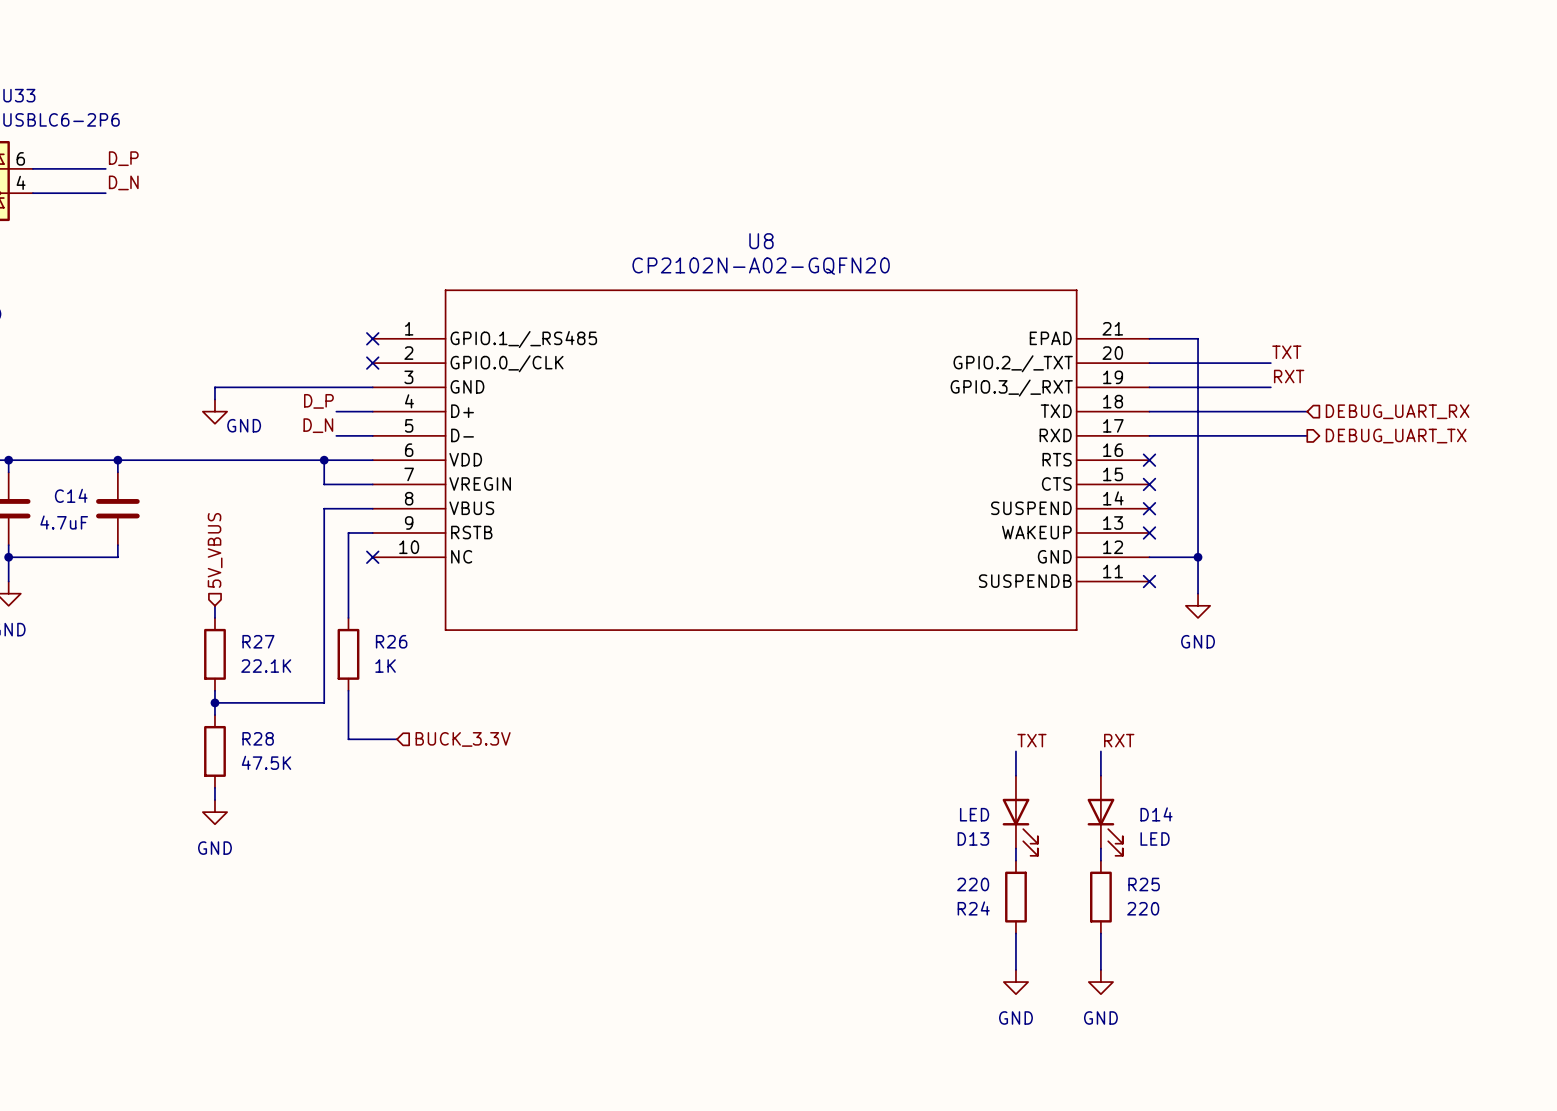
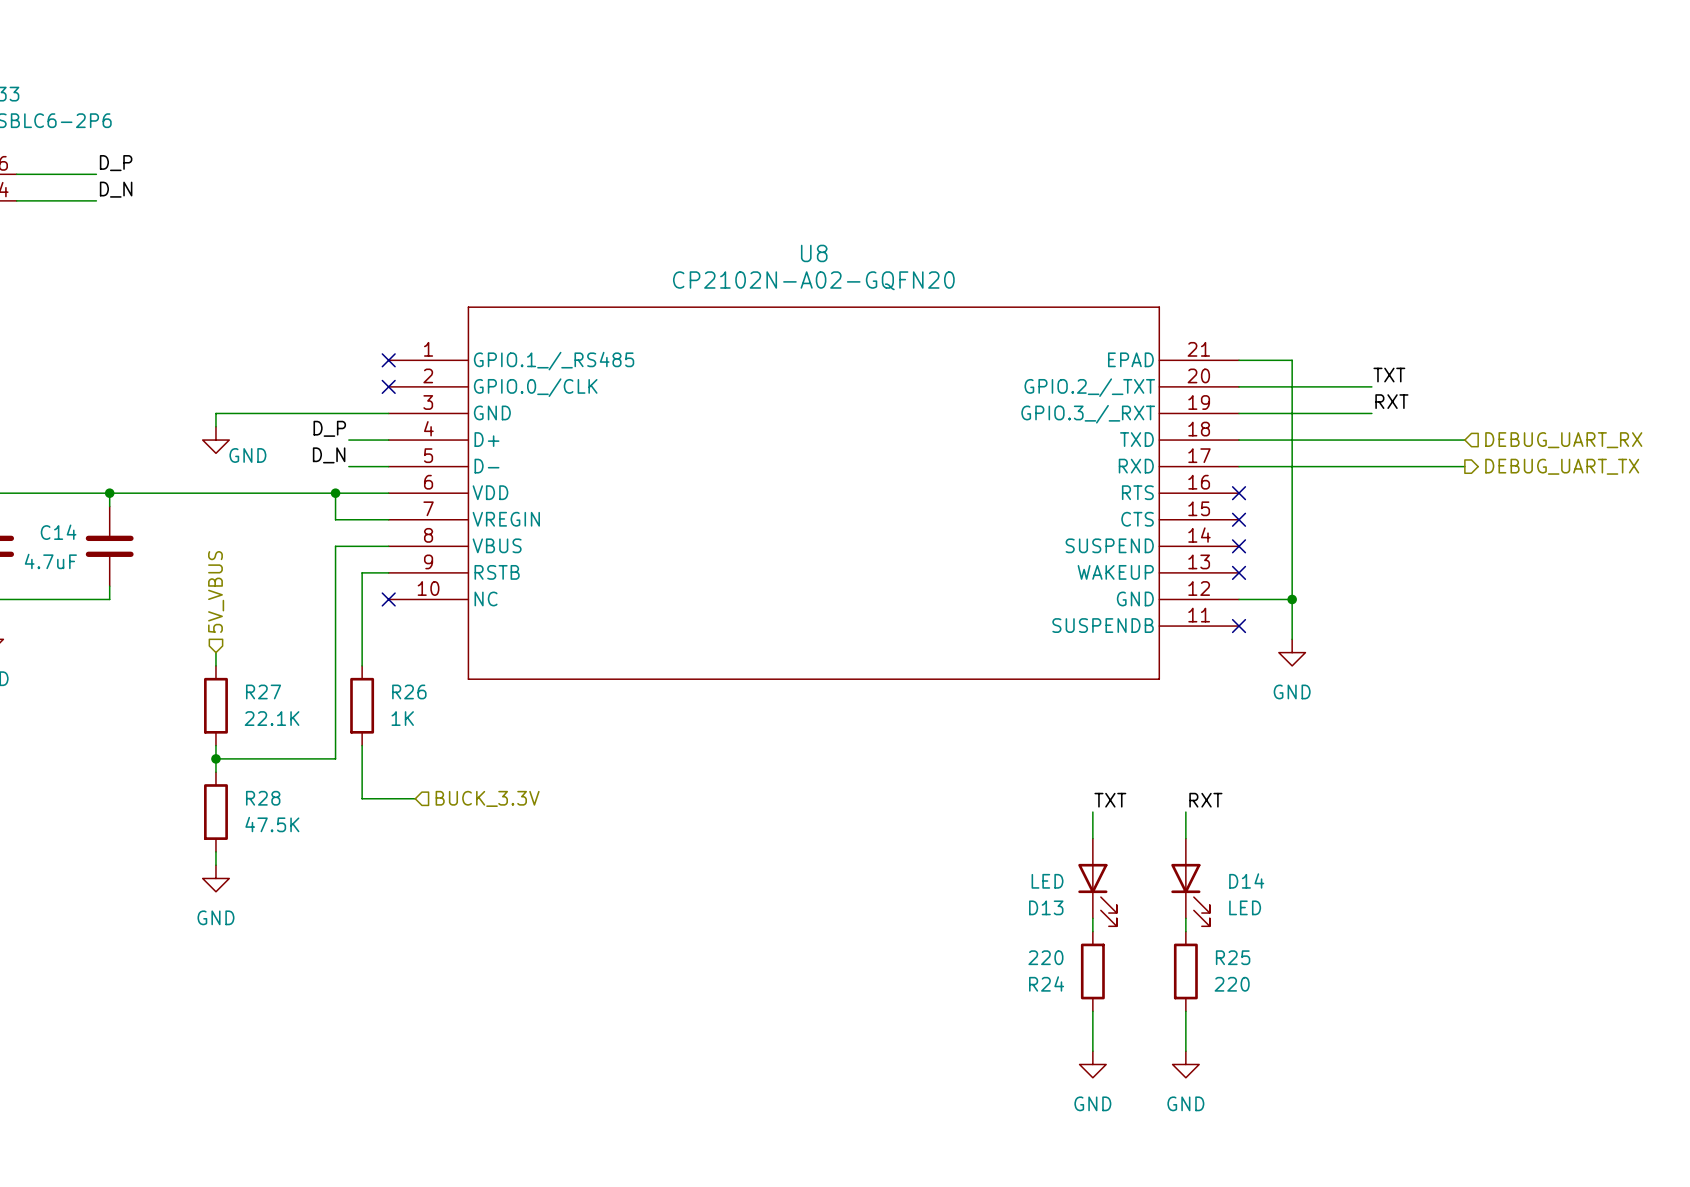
wire: none -> (1411, 440) (1464, 440)
hierarchical label position: DEBUG_UART_RX (1397, 411) -> DEBUG_UART_RX (1563, 440)
wire: none -> (1411, 466) (1464, 466)
hierarchical label position: DEBUG_UART_TX (1396, 436) -> DEBUG_UART_TX (1562, 466)

